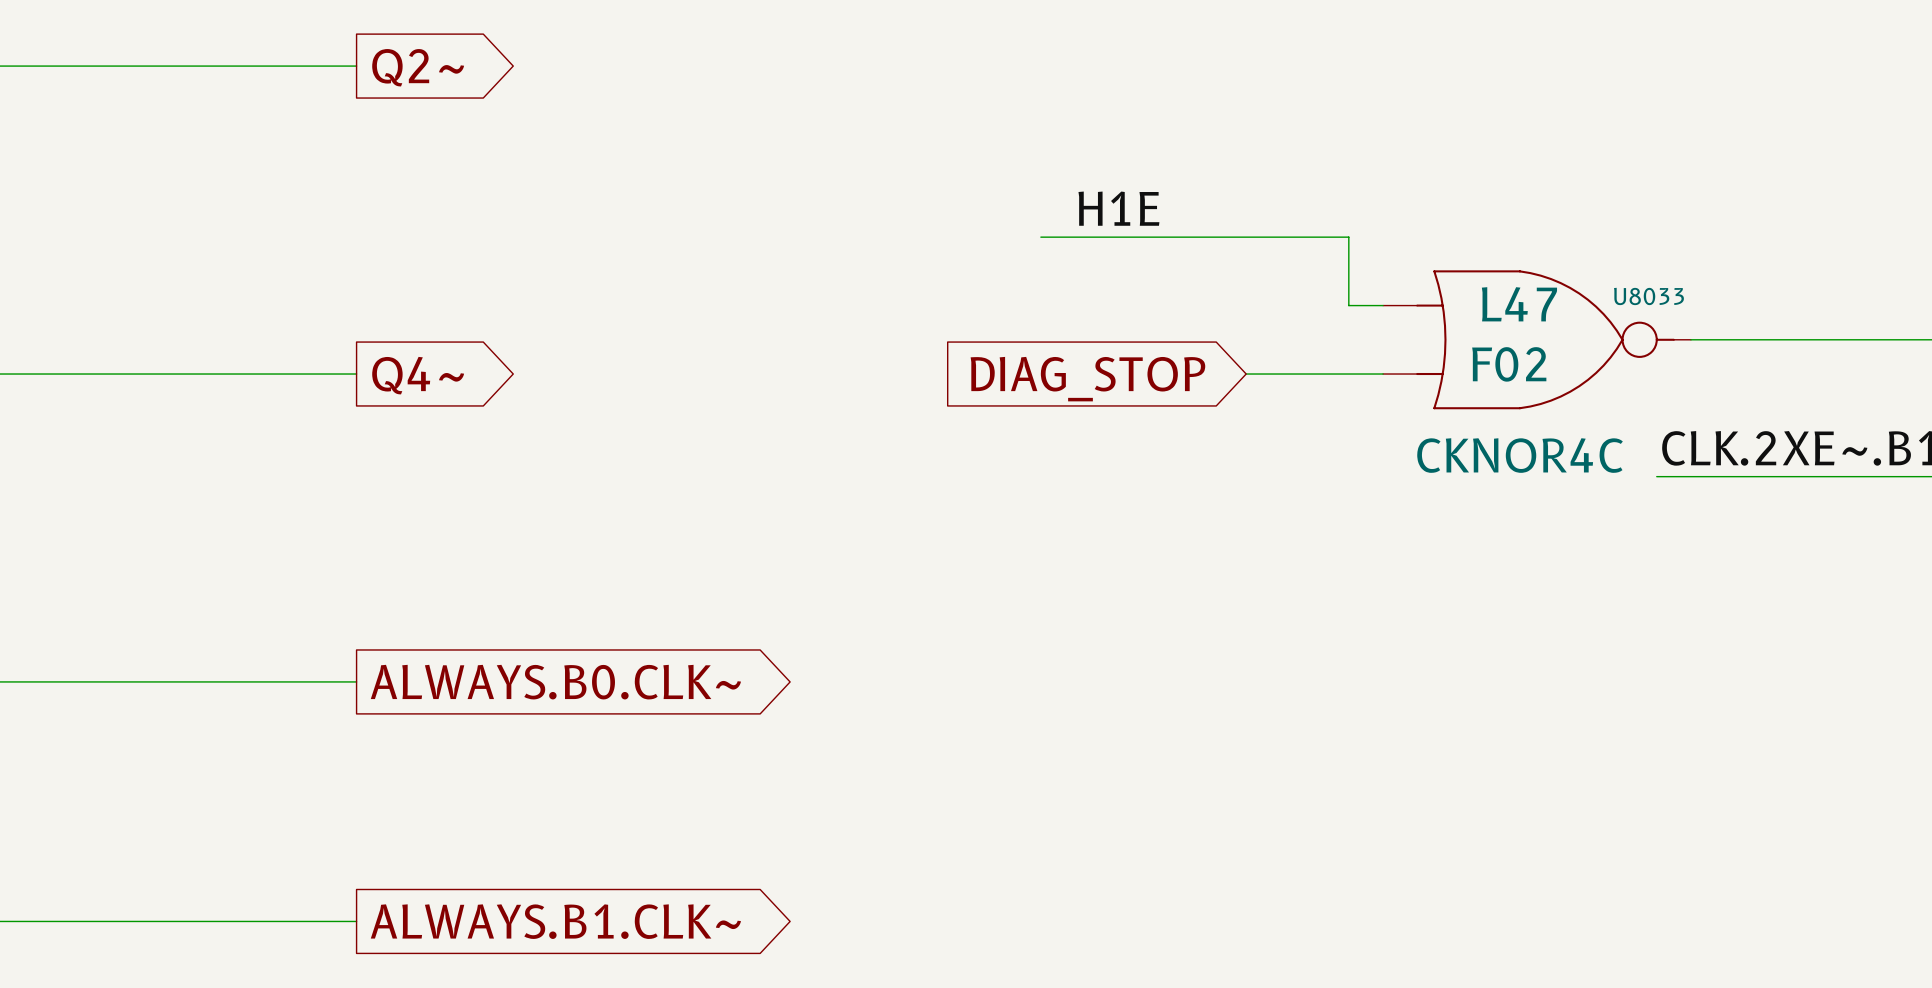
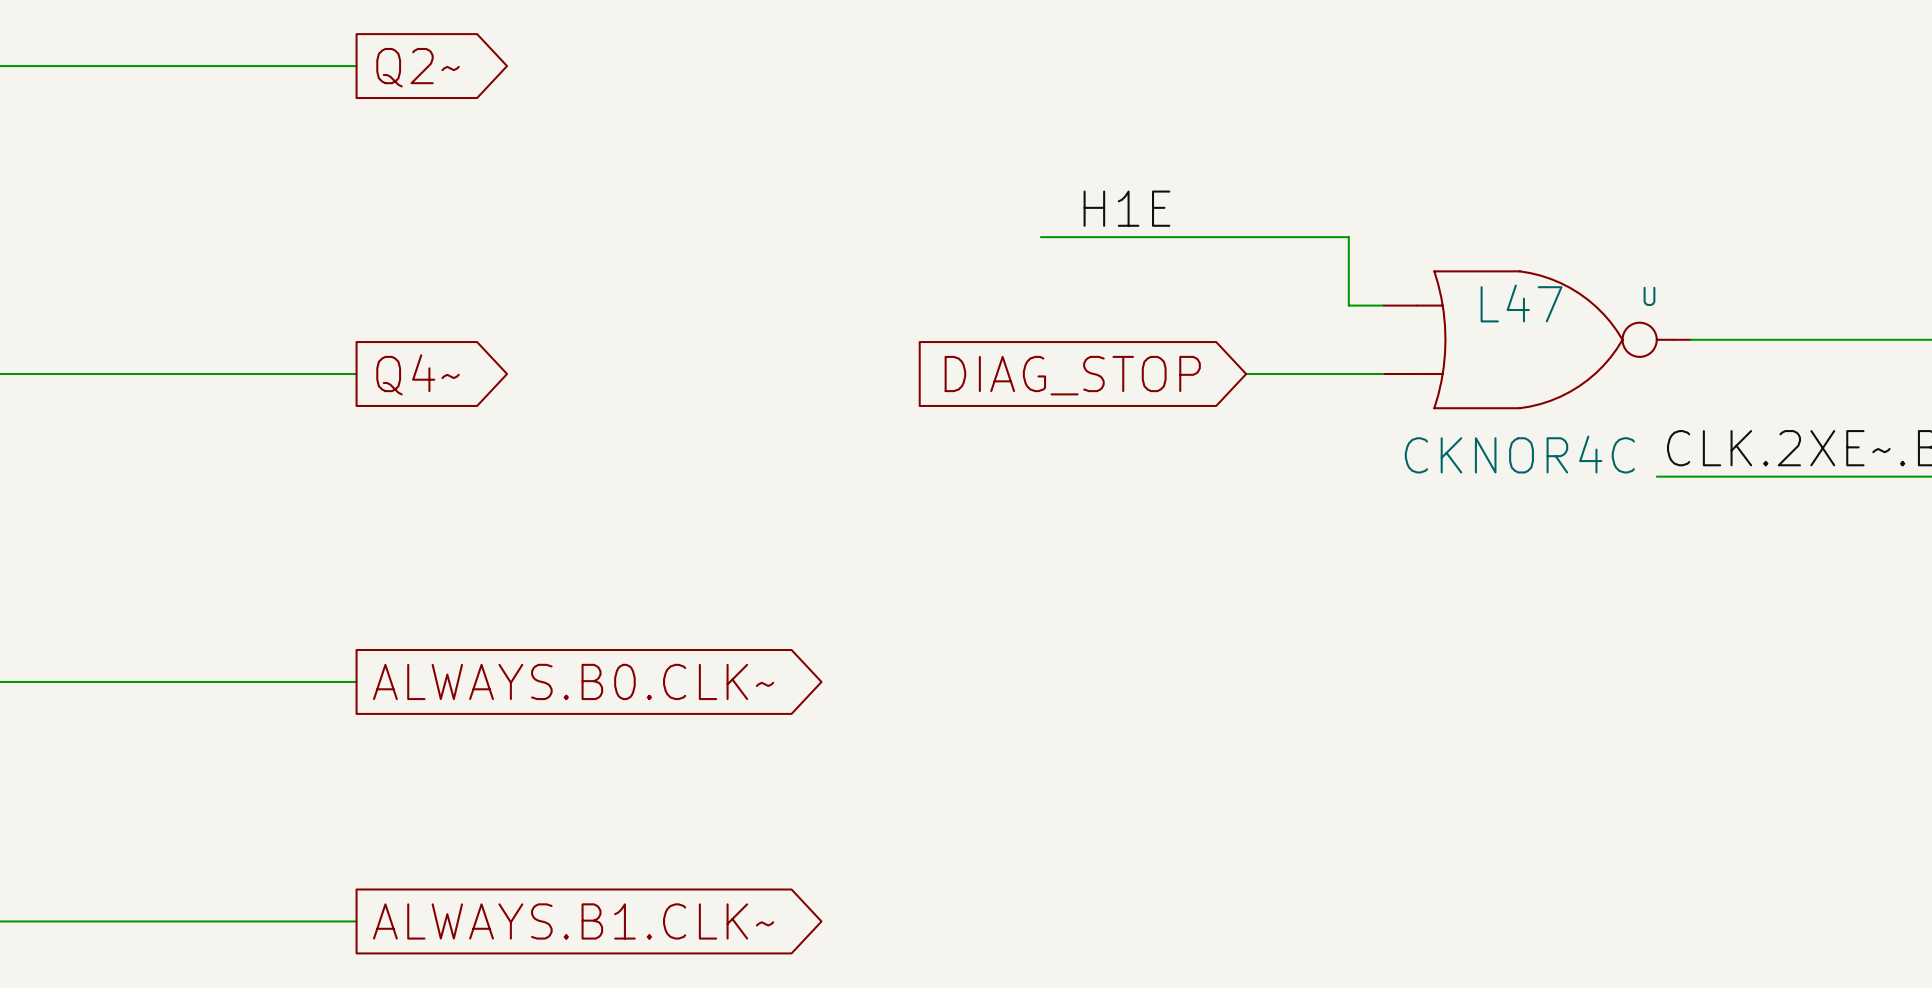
U8033 name: U8033 (1648, 296) -> U (1649, 296)
U8033 value: F02 (1509, 364) -> none

